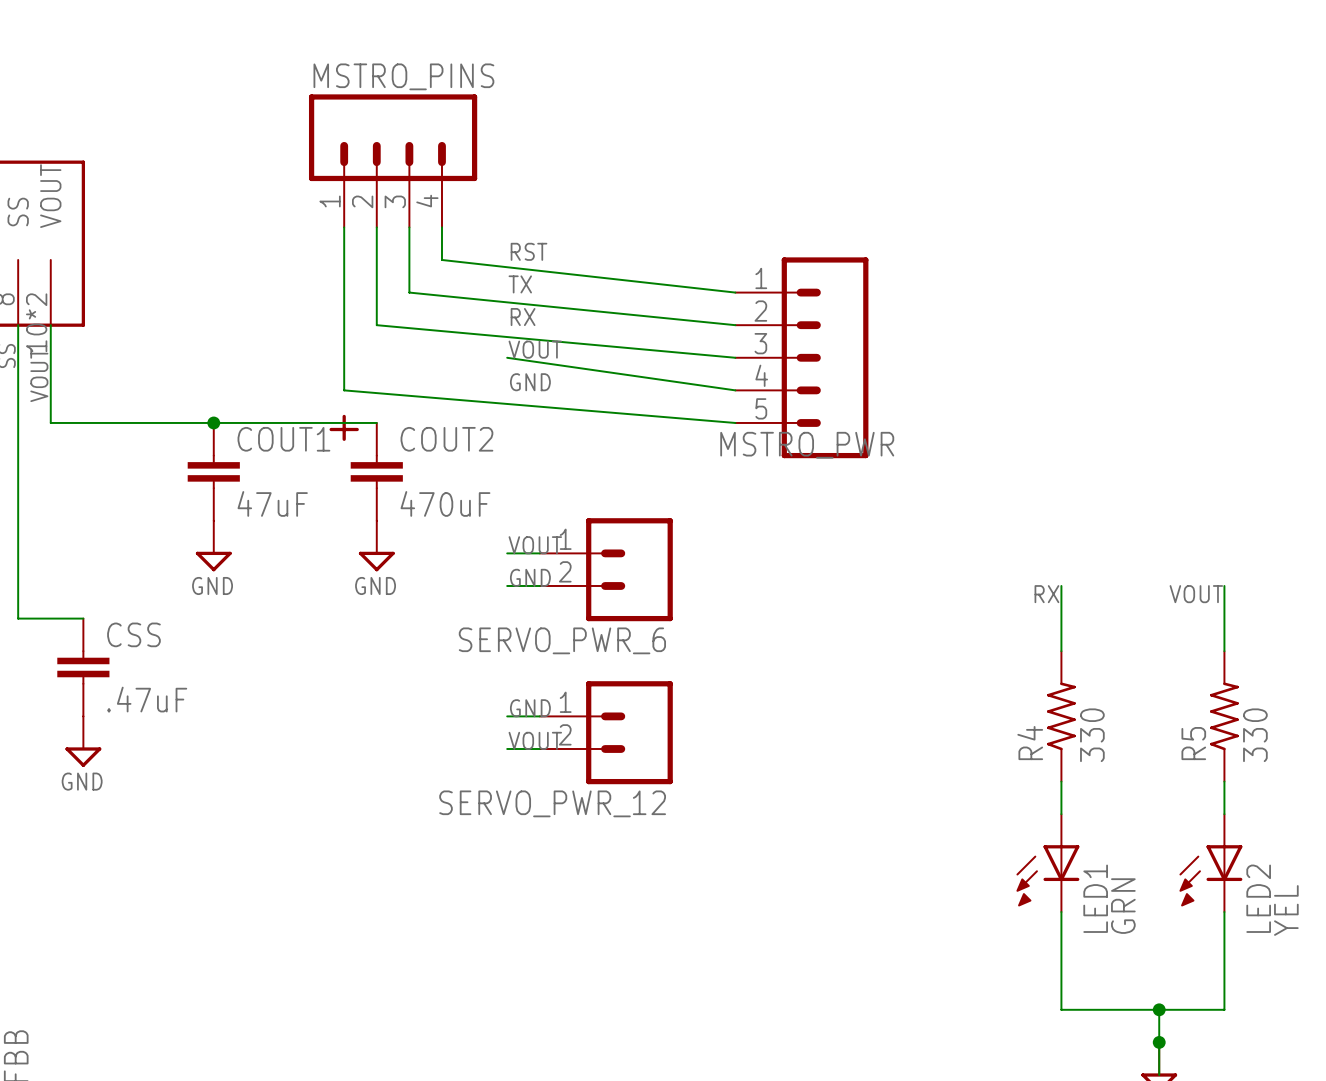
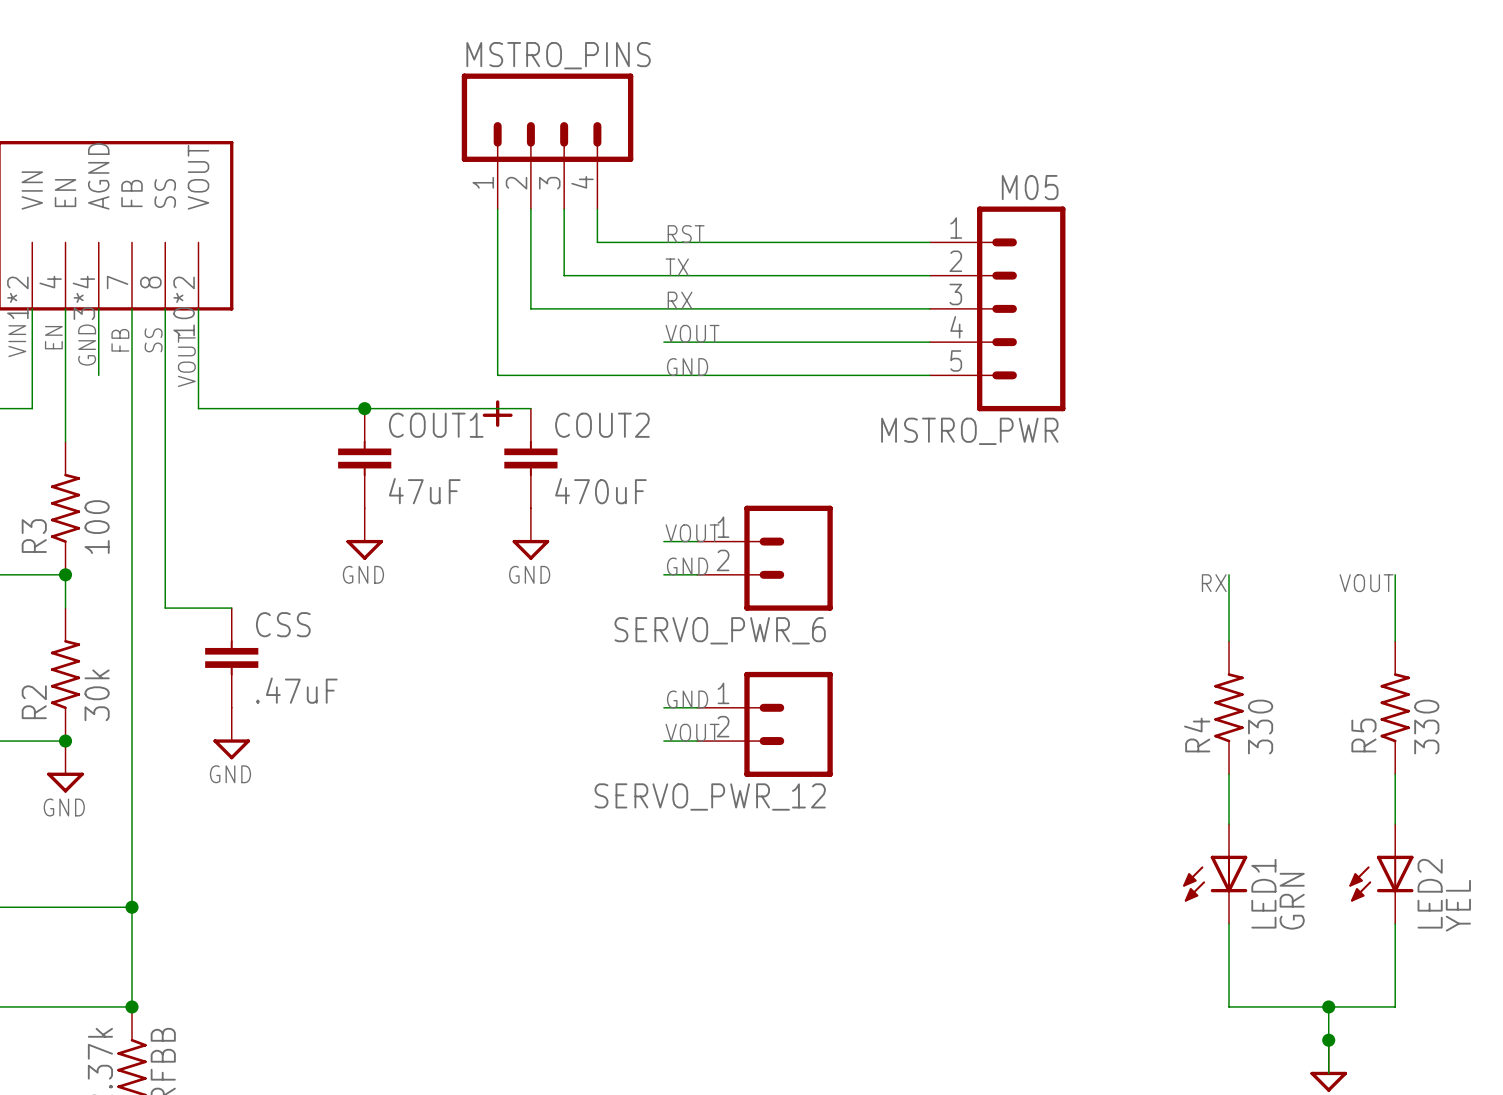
wire: (441, 259) (735, 292) -> (597, 242) (929, 242)
wire: (409, 292) (735, 325) -> (564, 275) (929, 275)
wire: (376, 325) (735, 357) -> (530, 308) (929, 308)
MSTRO_PWR: none -> M05 (997, 308)
wire: (507, 357) (735, 390) -> (663, 342) (929, 342)
MSTRO_PWR: (801, 357) -> none
wire: (344, 390) (735, 422) -> (497, 375) (929, 375)
LED1 symbol: [1016, 814, 1080, 913] -> [1183, 824, 1248, 924]
LED2 symbol: [1179, 814, 1243, 913] -> [1349, 824, 1414, 924]

